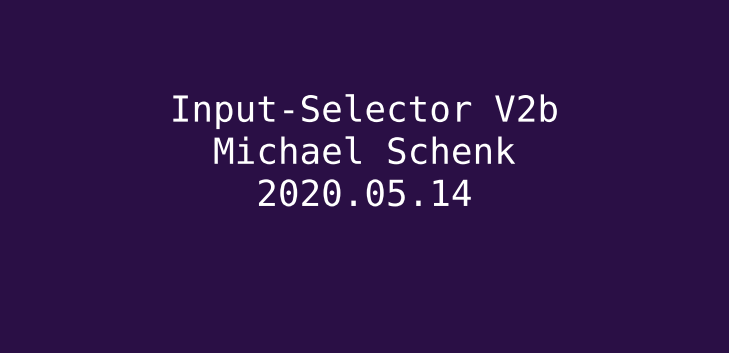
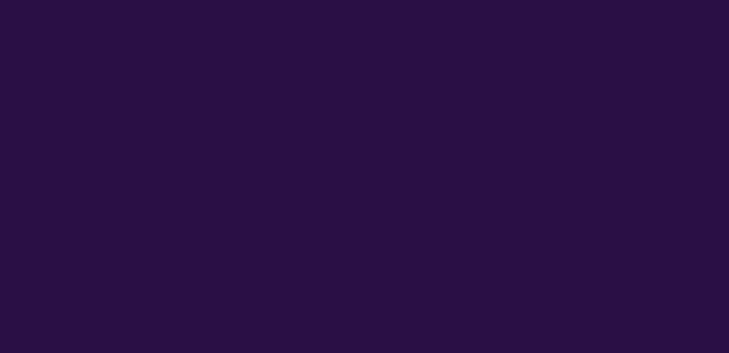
text: Input-Selector V2b (365, 111) -> none
text: Michael Schenk (364, 150) -> none
text: 2020.05.14 (364, 192) -> none

